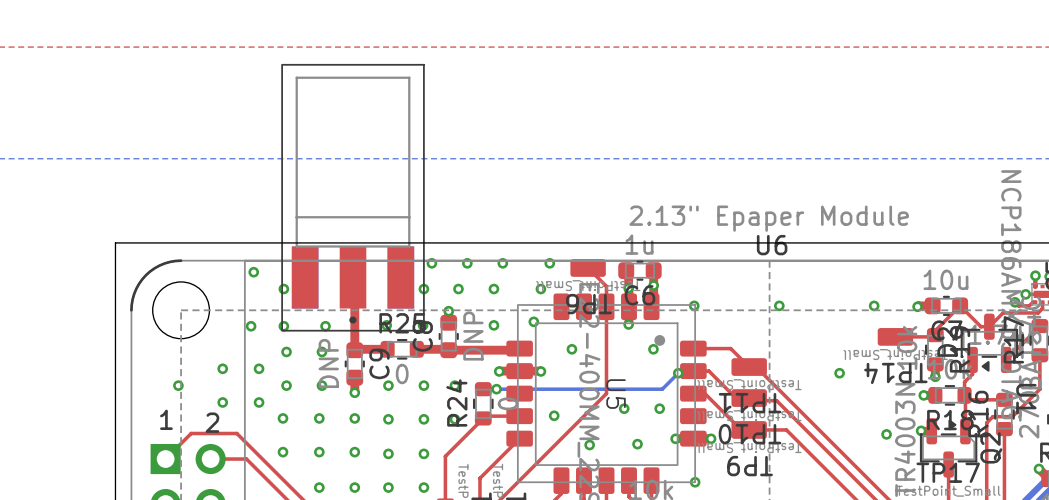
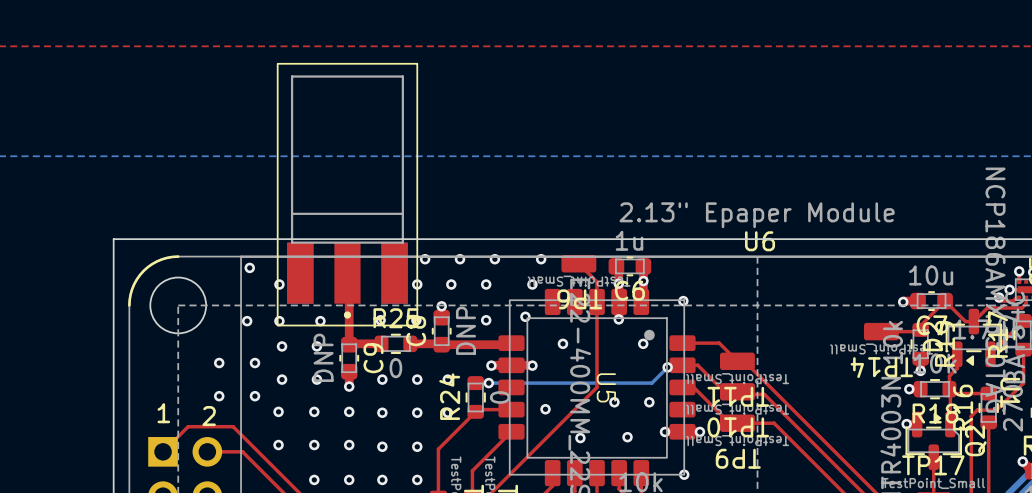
via: (779, 305) -> none
via: (874, 305) -> none
via: (839, 373) -> none
via: (178, 385) -> none
via: (886, 434) -> none

